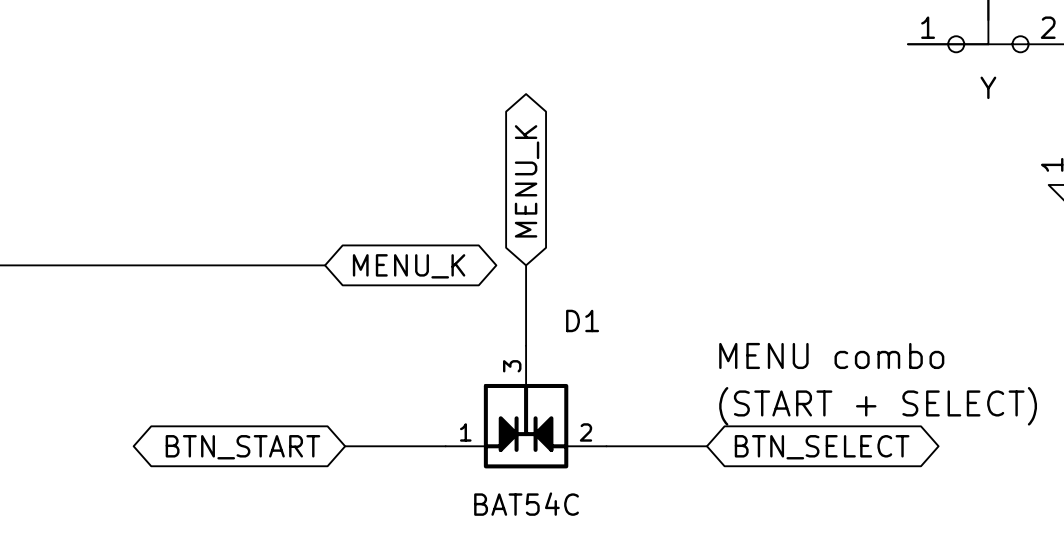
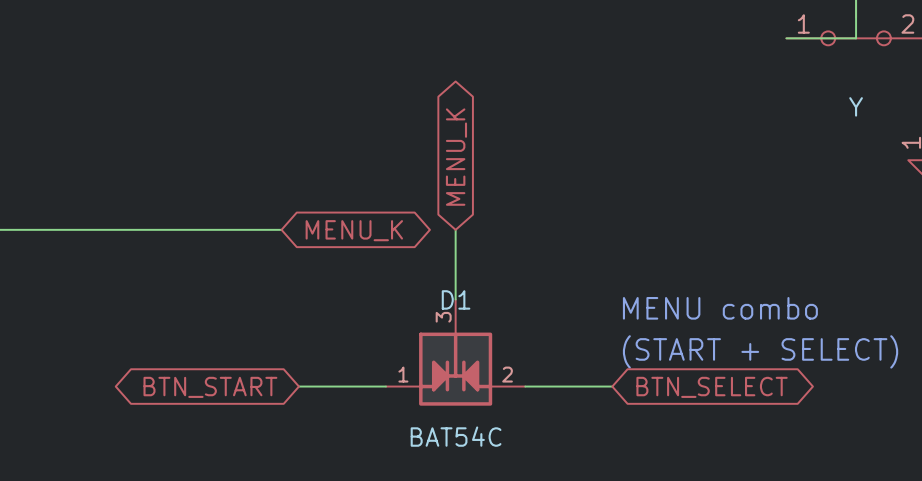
part value position: Y (988, 87) -> Y (856, 106)
D1 name position: D1 (582, 320) -> D1 (456, 299)

